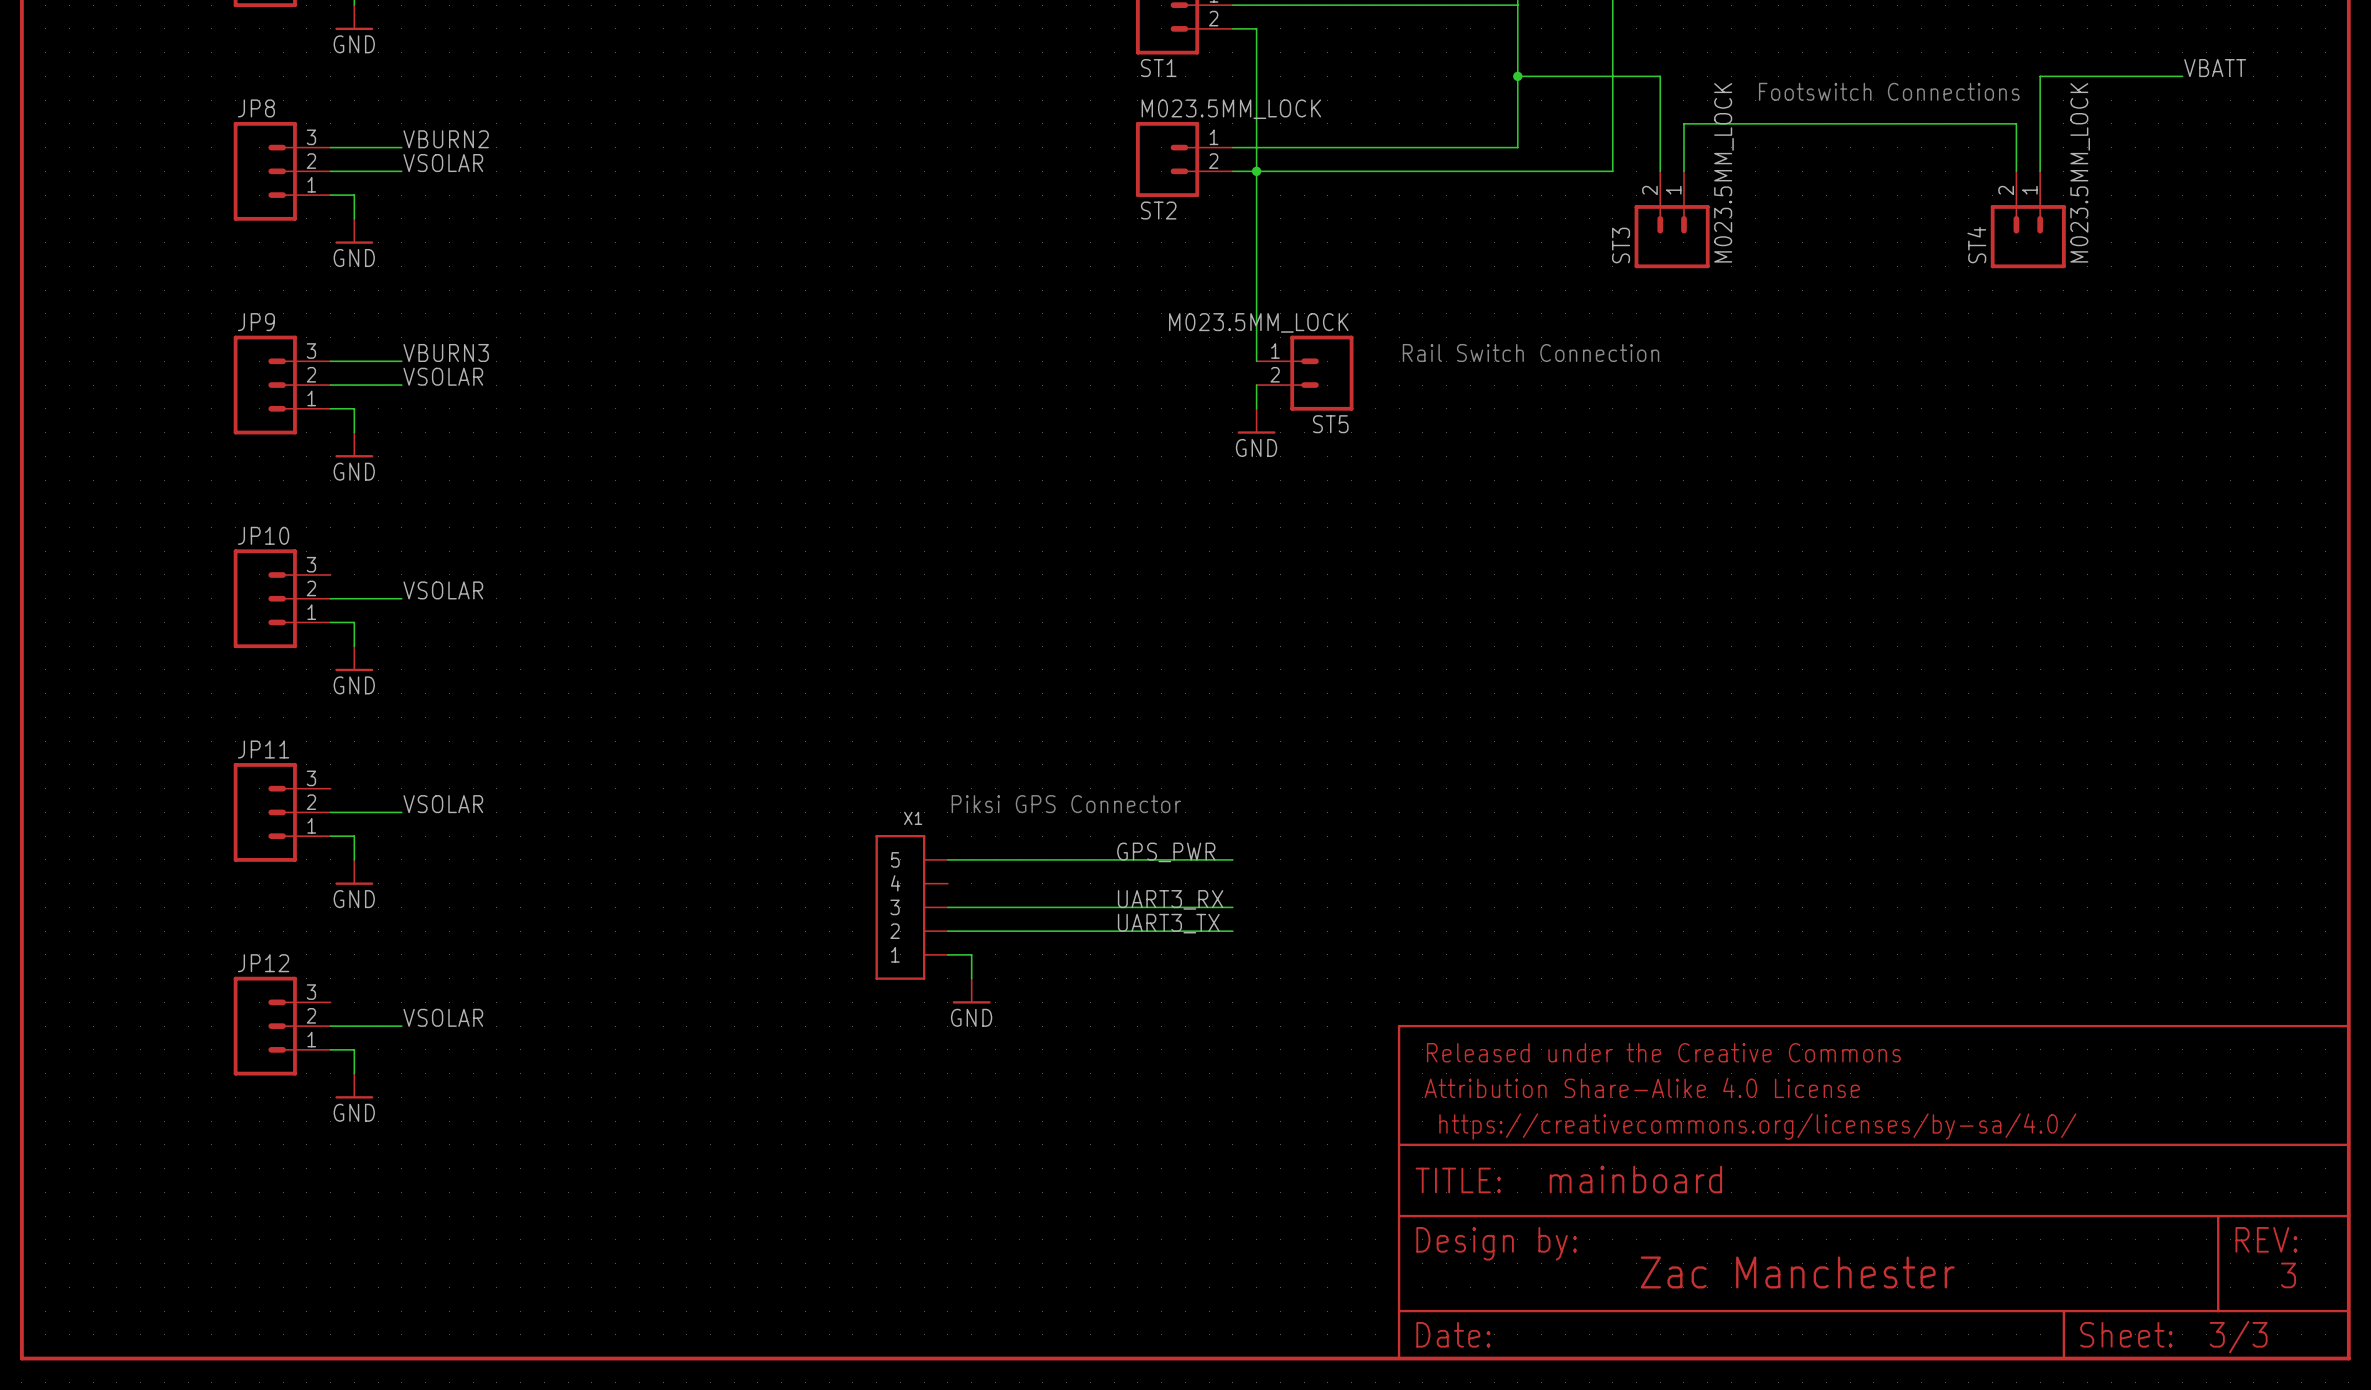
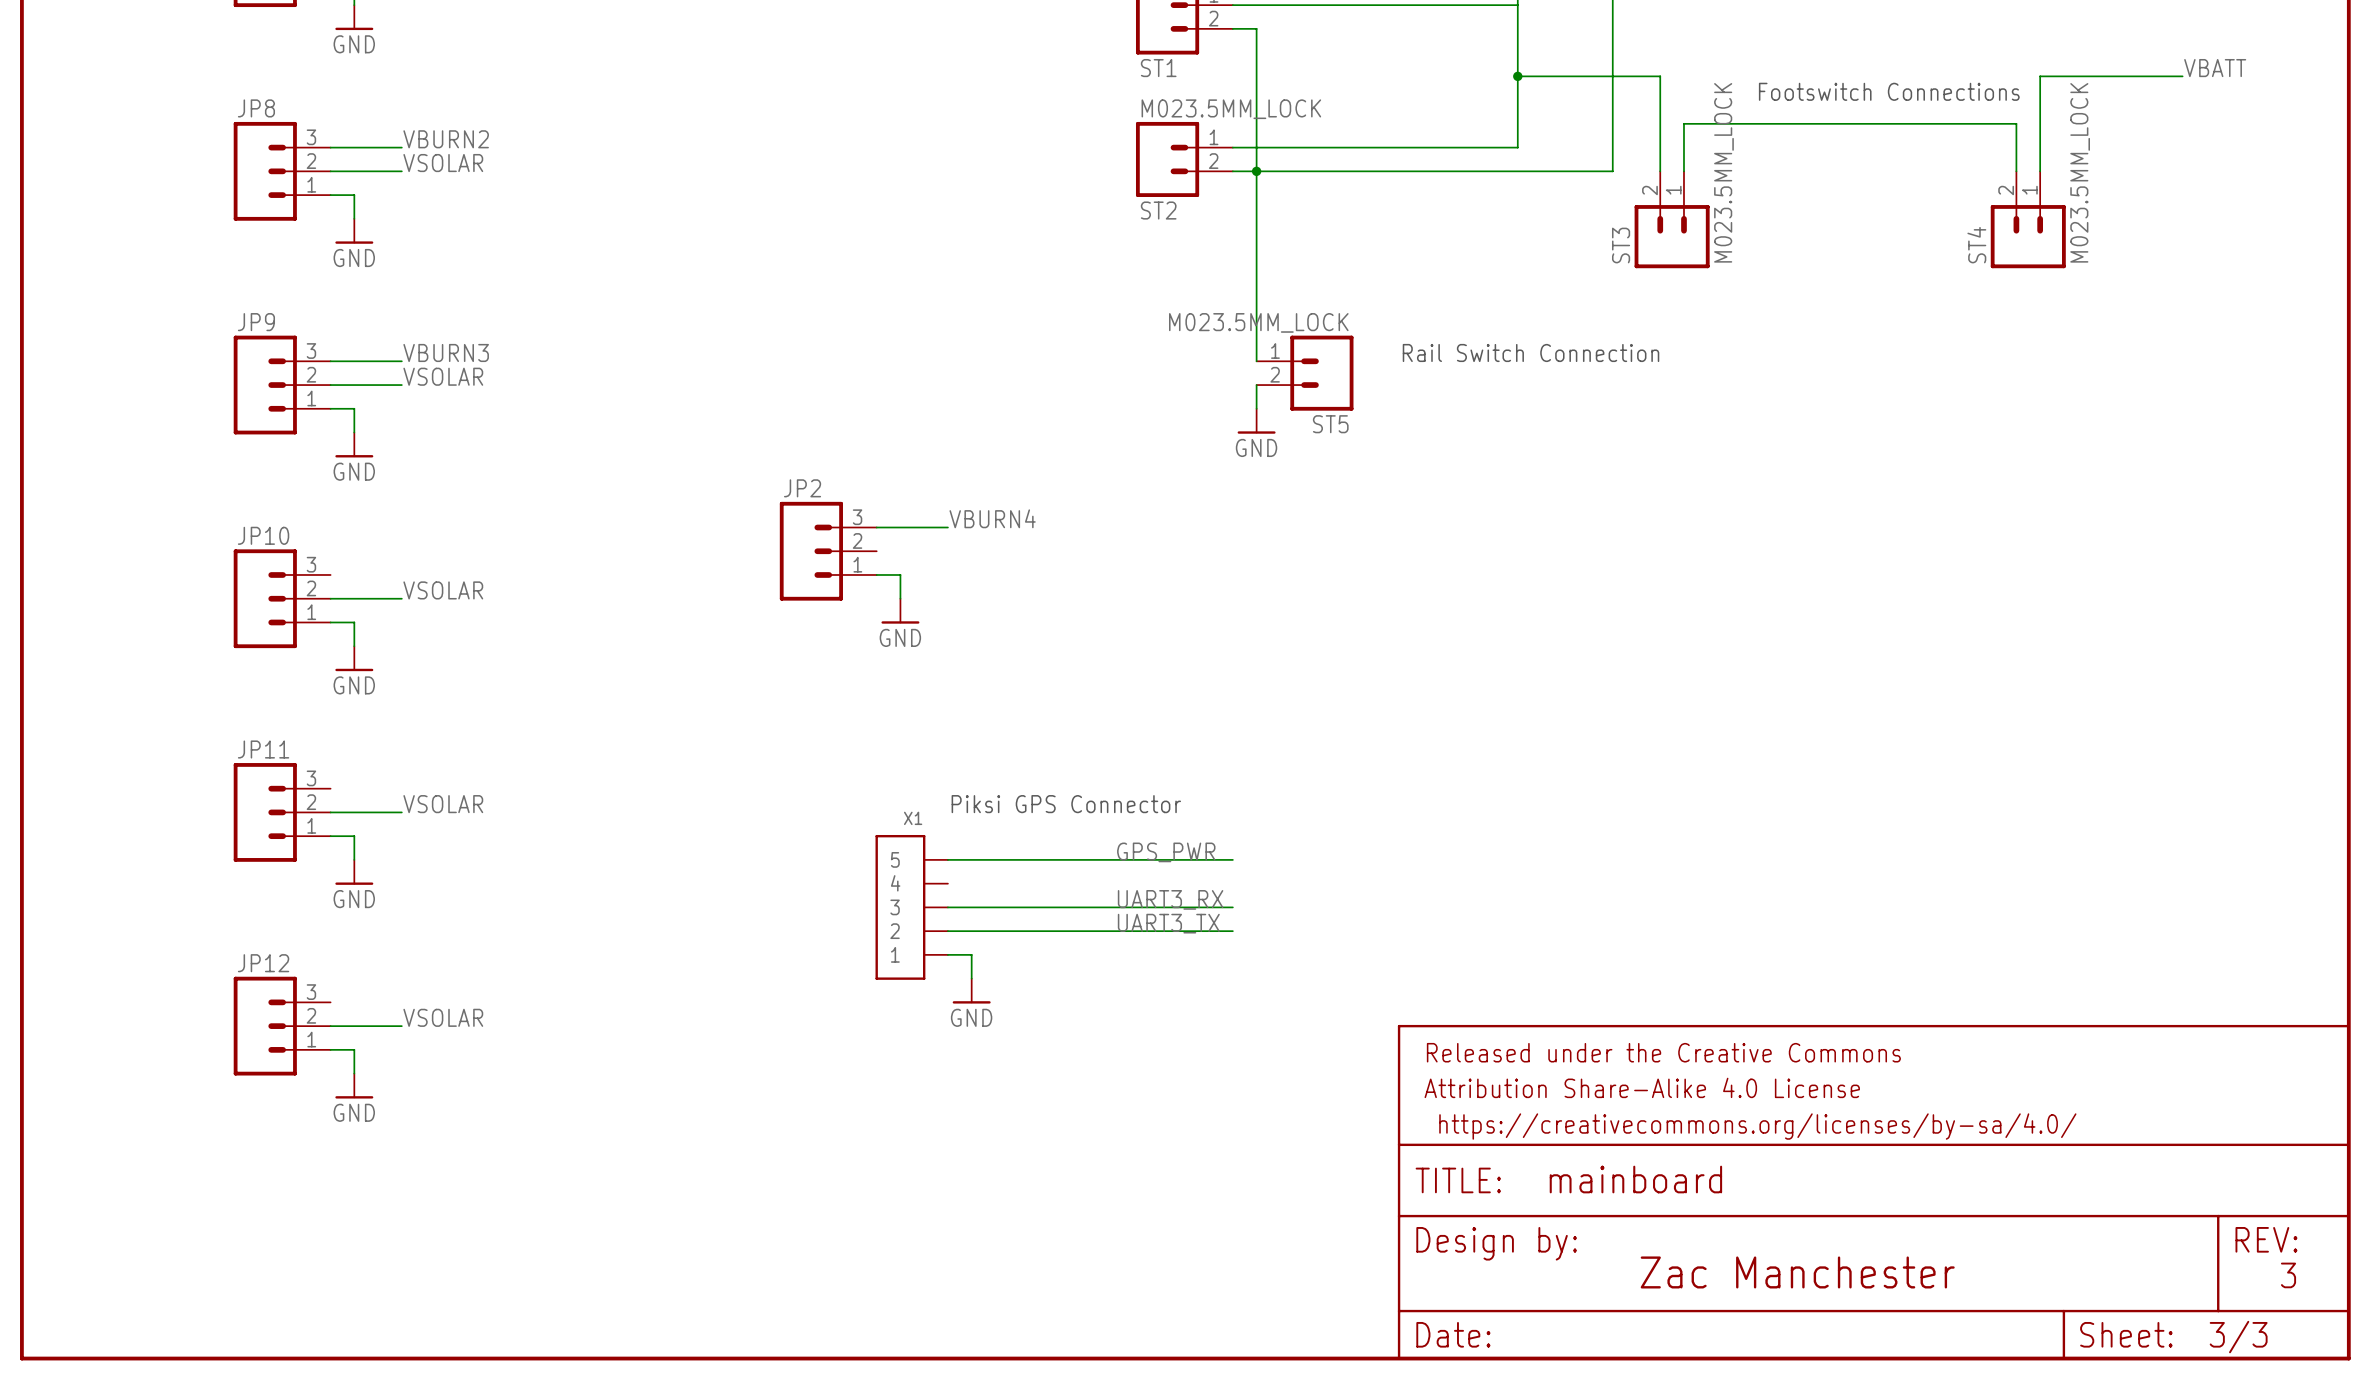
label: none -> VBURN4 (992, 518)
wire: none -> (876, 527) (947, 527)
JP2: none -> (828, 551)
wire: none -> (876, 574) (900, 574) (900, 598)
power symbol: none -> GND (900, 611)

